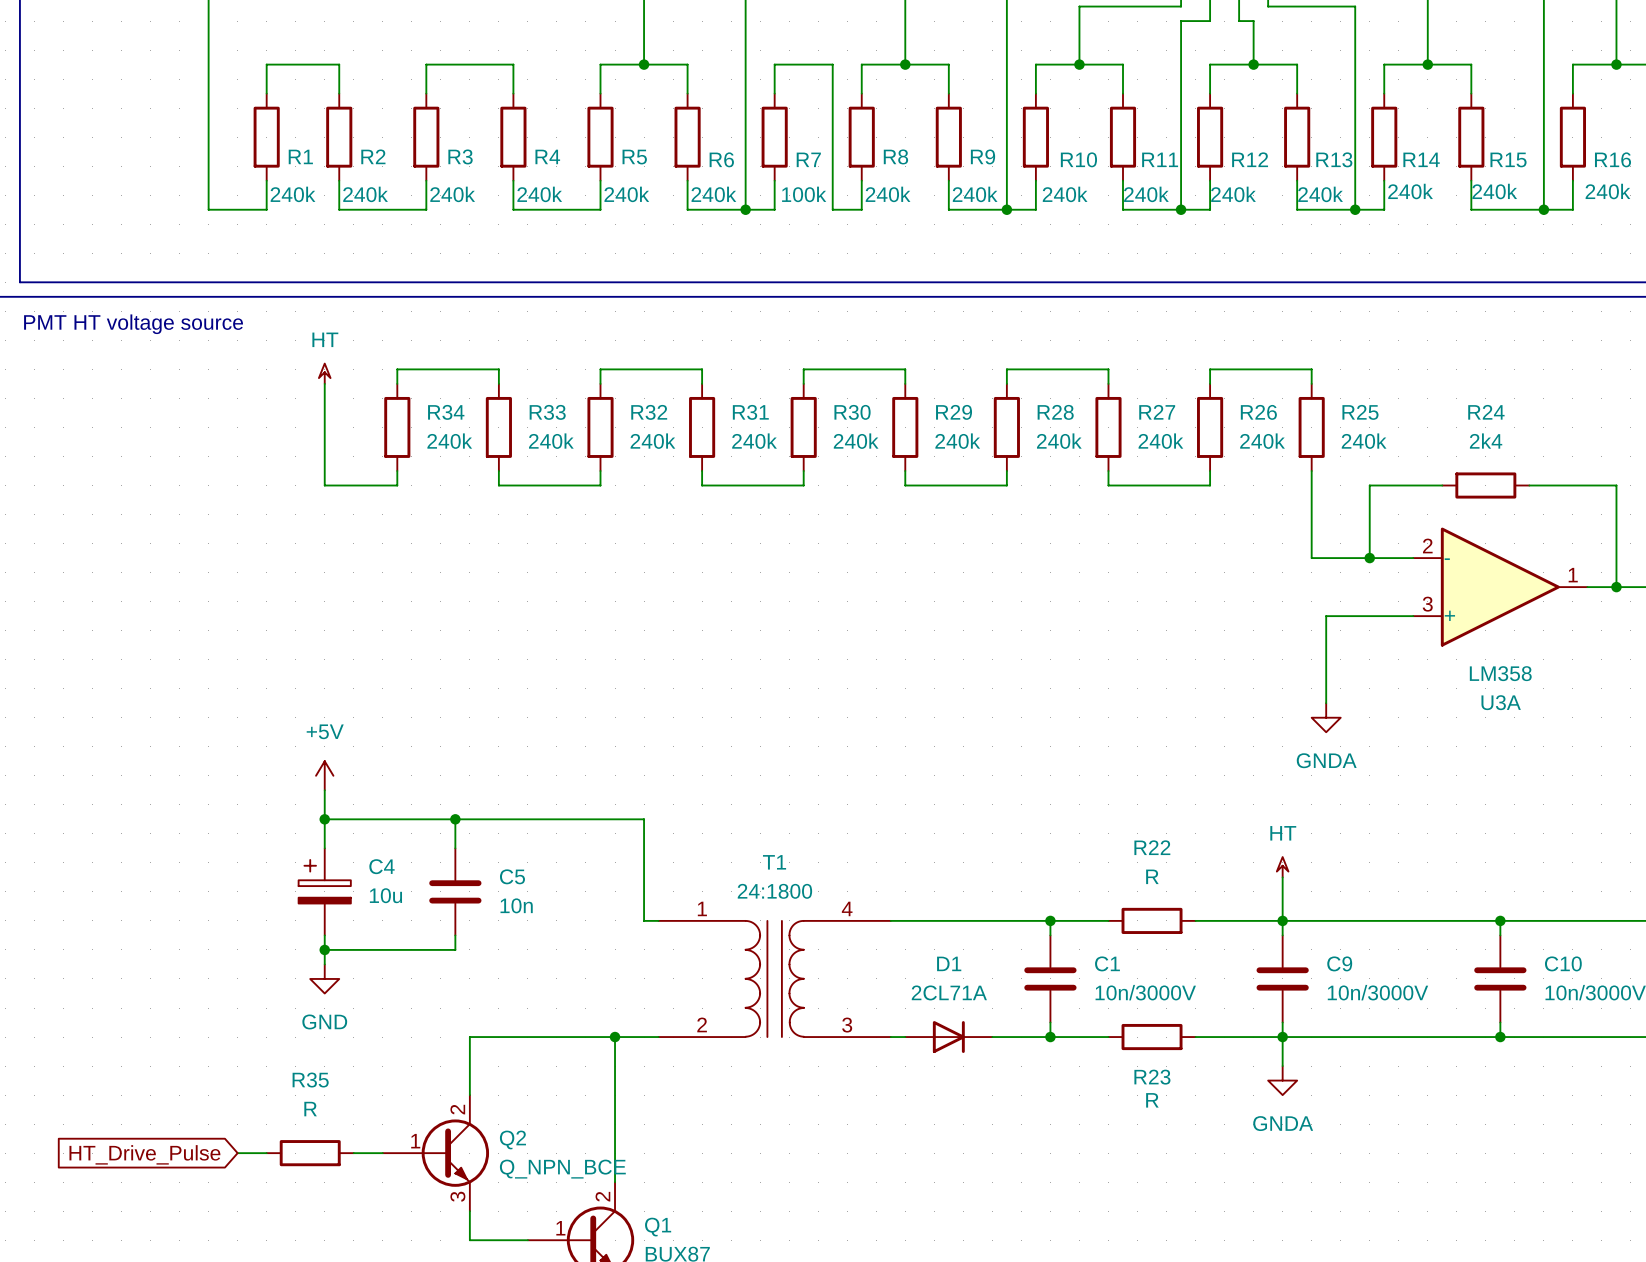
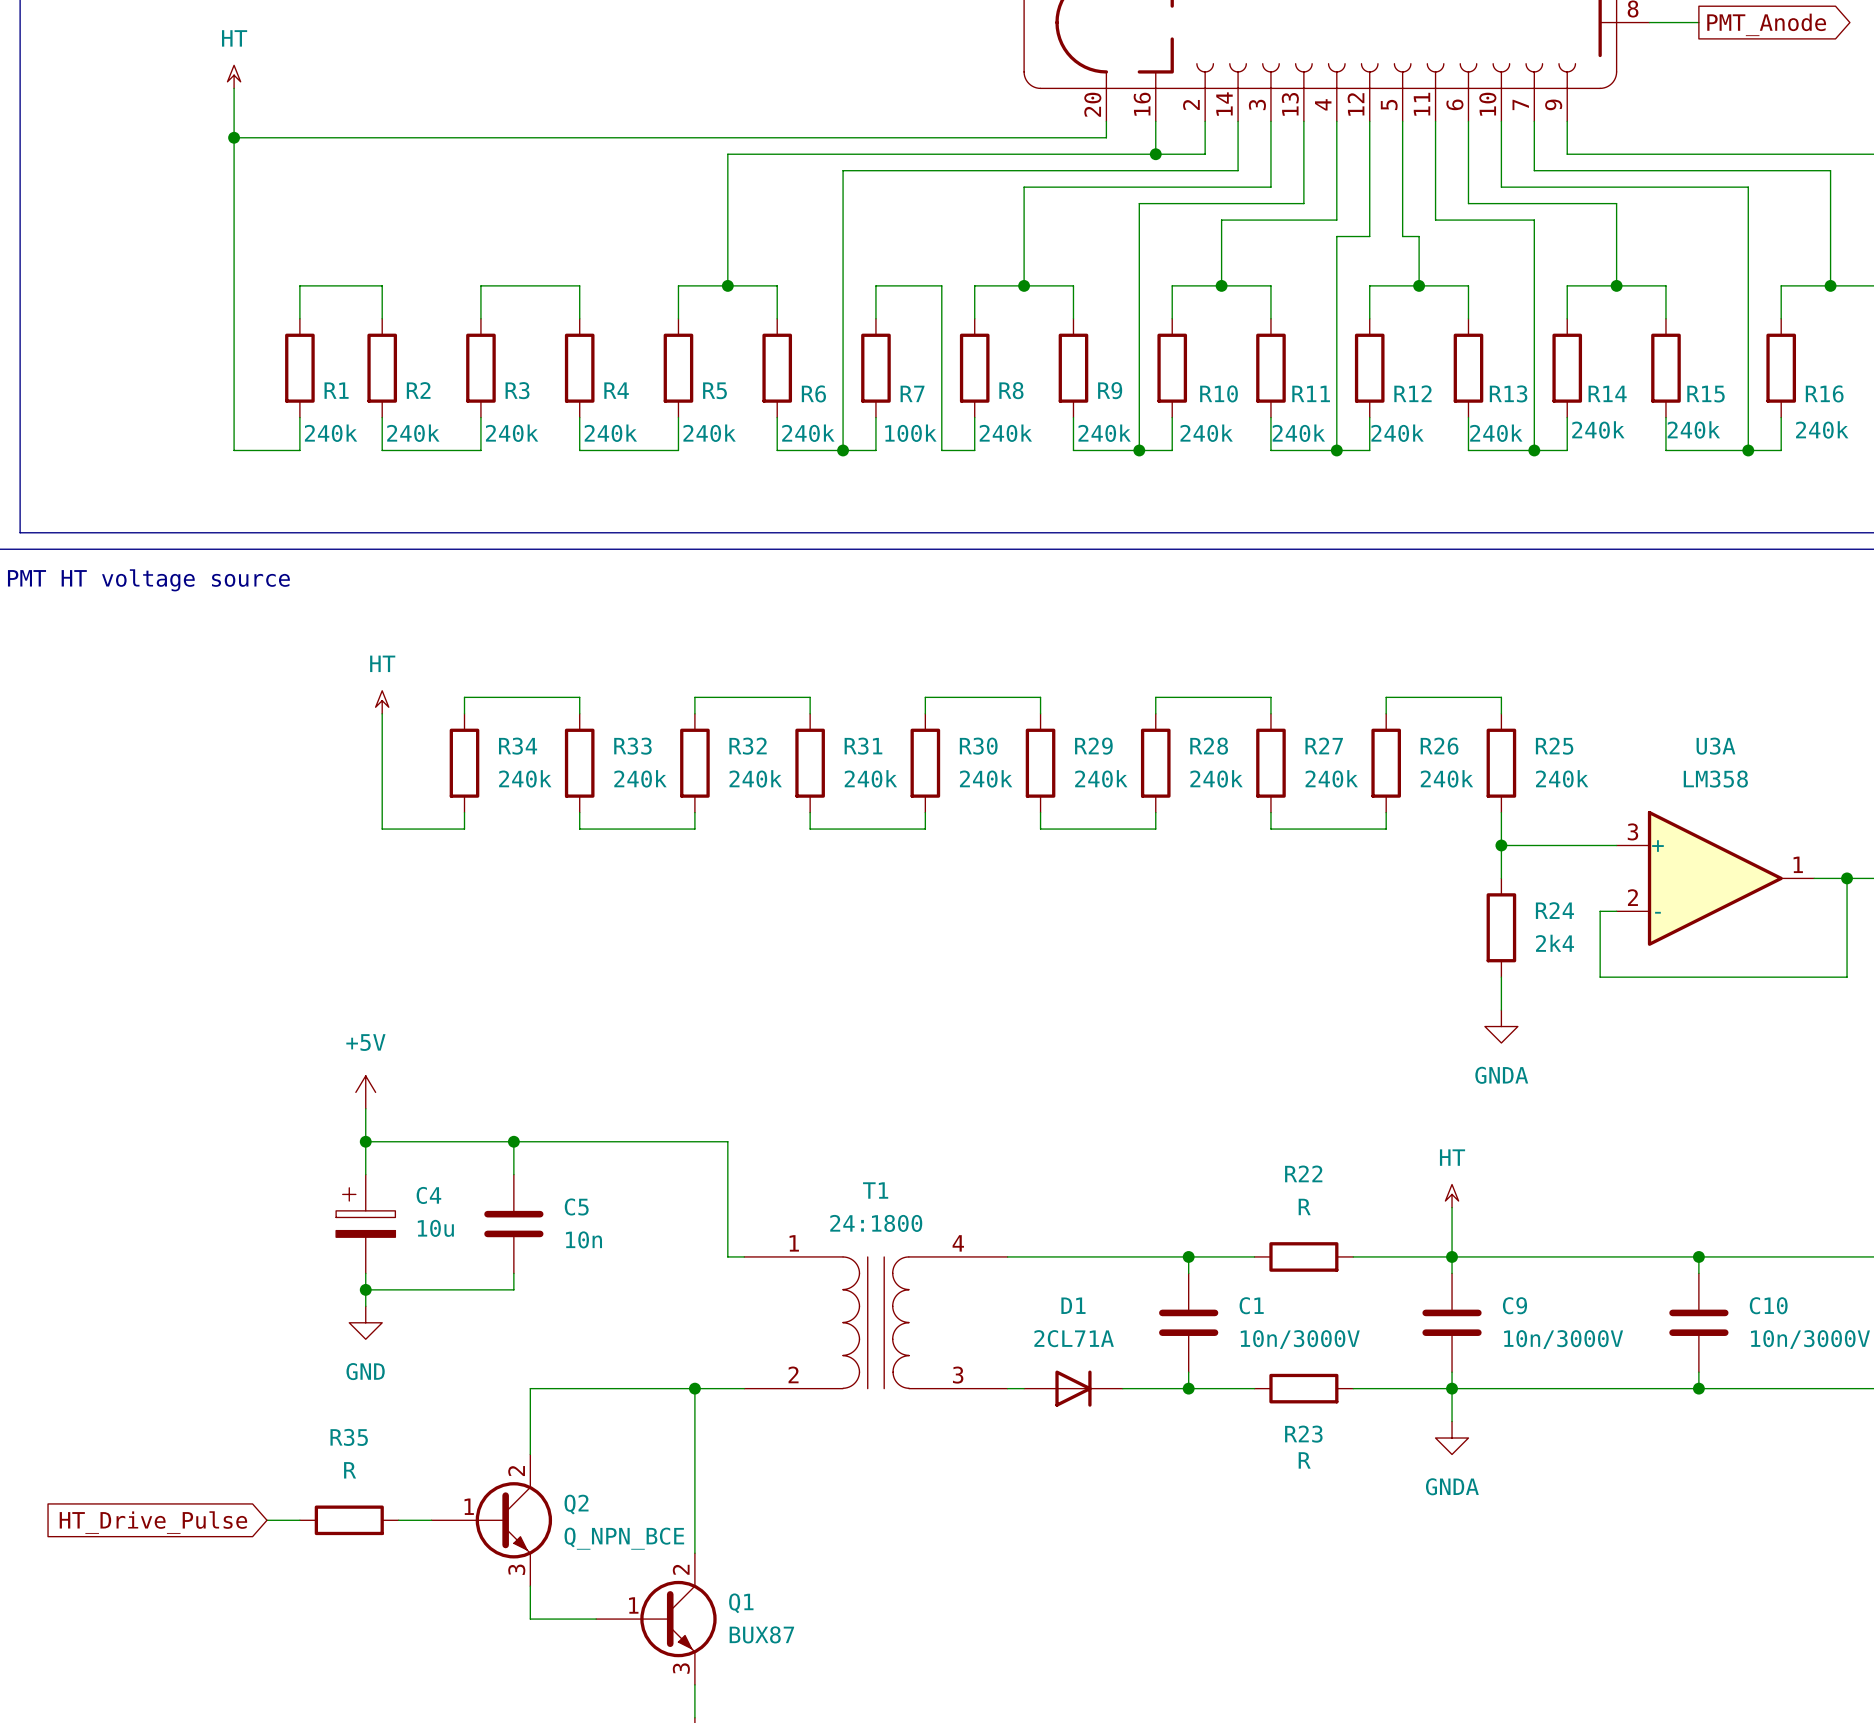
power symbol position: HT (324, 373) -> HT (382, 702)
wire: (324, 383) (324, 485) (397, 485) (397, 470) -> (382, 713) (382, 829) (464, 829) (464, 812)
wire: (397, 383) (397, 369) (498, 369) (498, 383) -> (464, 713) (464, 697) (579, 697) (579, 713)
wire: (600, 383) (600, 369) (702, 369) (702, 383) -> (694, 713) (694, 697) (810, 697) (810, 713)
wire: (803, 383) (803, 369) (905, 369) (905, 383) -> (925, 713) (925, 697) (1040, 697) (1040, 713)
wire: (1006, 383) (1006, 369) (1108, 369) (1108, 383) -> (1155, 713) (1155, 697) (1270, 697) (1270, 713)
wire: (1210, 383) (1210, 369) (1311, 369) (1311, 383) -> (1386, 713) (1386, 697) (1501, 697) (1501, 713)
R24 name position: R24 (1486, 412) -> R24 (1554, 910)
R34 position: (397, 427) -> (464, 763)
R33 position: (498, 427) -> (579, 763)
R32 position: (600, 427) -> (694, 763)
R31 position: (702, 427) -> (810, 763)
R30 position: (803, 427) -> (925, 763)
R29 position: (905, 427) -> (1040, 763)
R28 position: (1006, 427) -> (1155, 763)
R27 position: (1108, 427) -> (1270, 763)
R26 position: (1210, 427) -> (1386, 763)
R25 position: (1311, 427) -> (1501, 763)
wire: (498, 470) (498, 485) (600, 485) (600, 470) -> (579, 812) (579, 829) (694, 829) (694, 812)
wire: (702, 470) (702, 485) (803, 485) (803, 470) -> (810, 812) (810, 829) (925, 829) (925, 812)
wire: (905, 470) (905, 485) (1006, 485) (1006, 470) -> (1040, 812) (1040, 829) (1155, 829) (1155, 812)
wire: (1108, 470) (1108, 485) (1210, 485) (1210, 470) -> (1270, 812) (1270, 829) (1386, 829) (1386, 812)
wire: (1311, 470) (1311, 558) (1326, 558) -> none
wire: (1442, 485) (1369, 485) (1369, 558) -> none
R24 rotation: 0° (1485, 485) -> 90° clockwise (1501, 927)
R24 position: (1485, 485) -> (1501, 927)
wire: (1529, 485) (1616, 485) (1616, 587) -> none
wire: none -> (1501, 812) (1501, 878)
junction position: (1369, 558) -> (1501, 845)
U3A flip: as is (1500, 587) -> up-down (1715, 878)
junction position: (1616, 587) -> (1847, 878)
wire: none -> (1847, 878) (1847, 977) (1600, 977) (1600, 911) (1616, 911)
wire: (1413, 616) (1326, 616) (1326, 674) -> none

